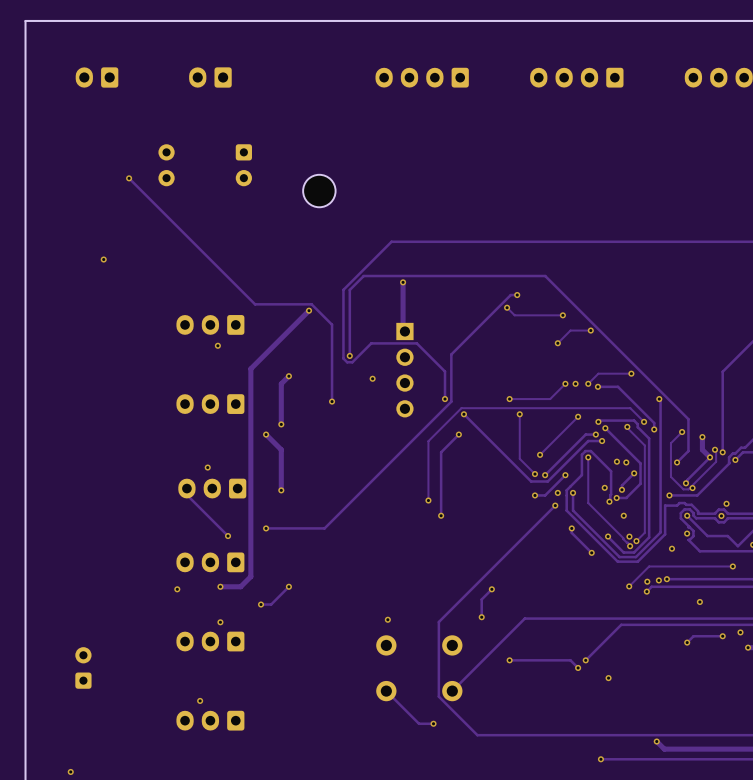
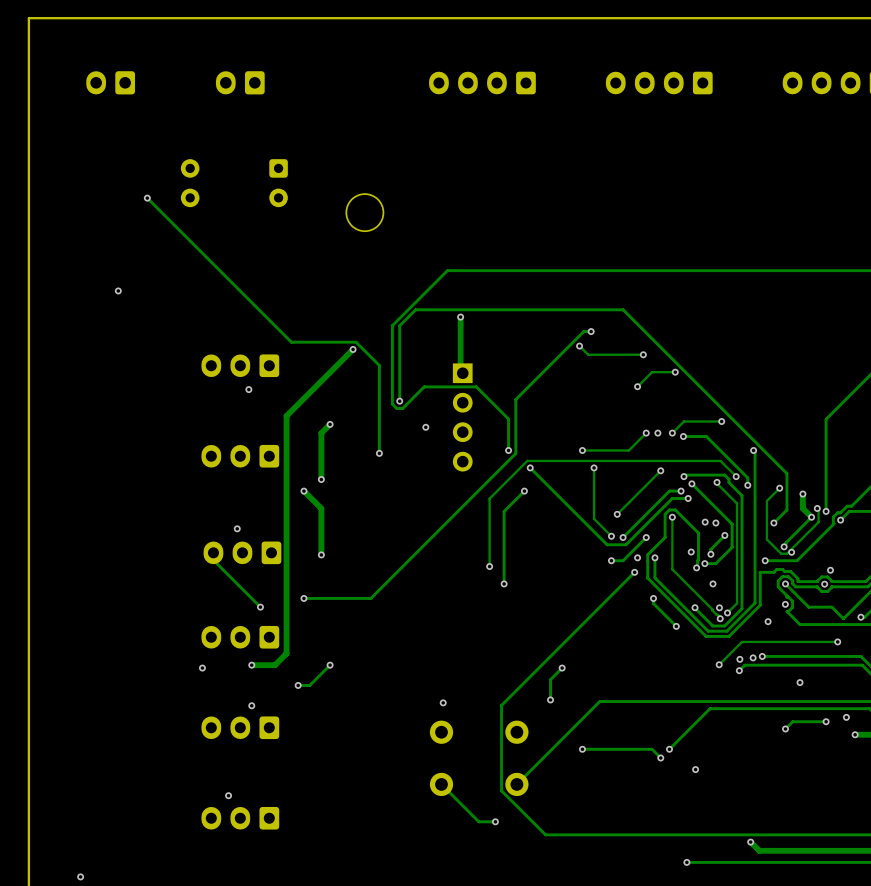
part: (83, 667) -> none

